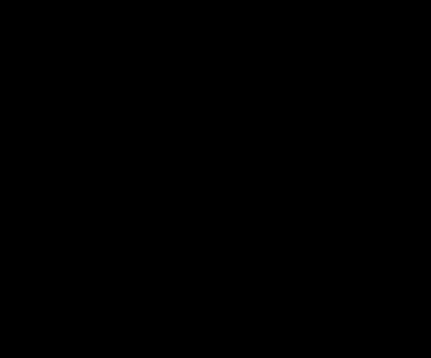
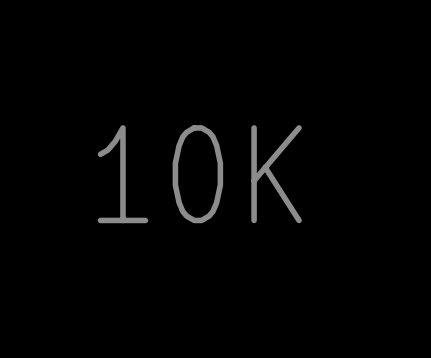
text: none -> 10K (199, 174)

